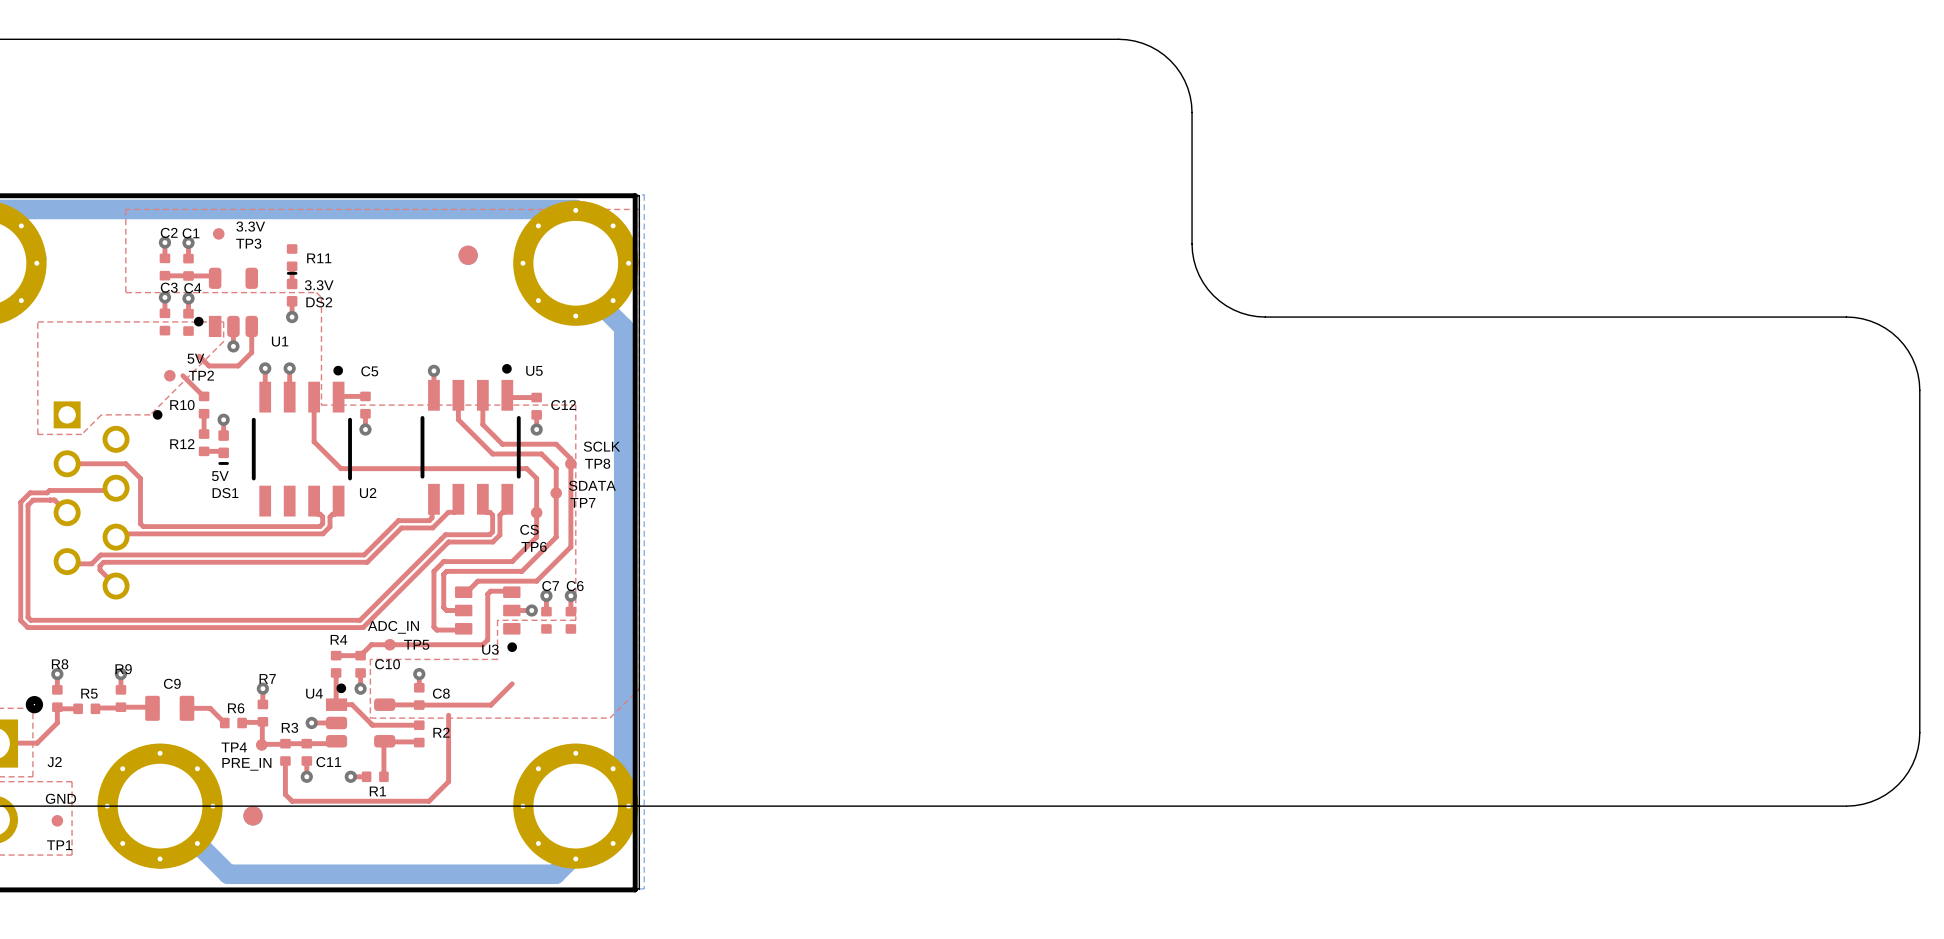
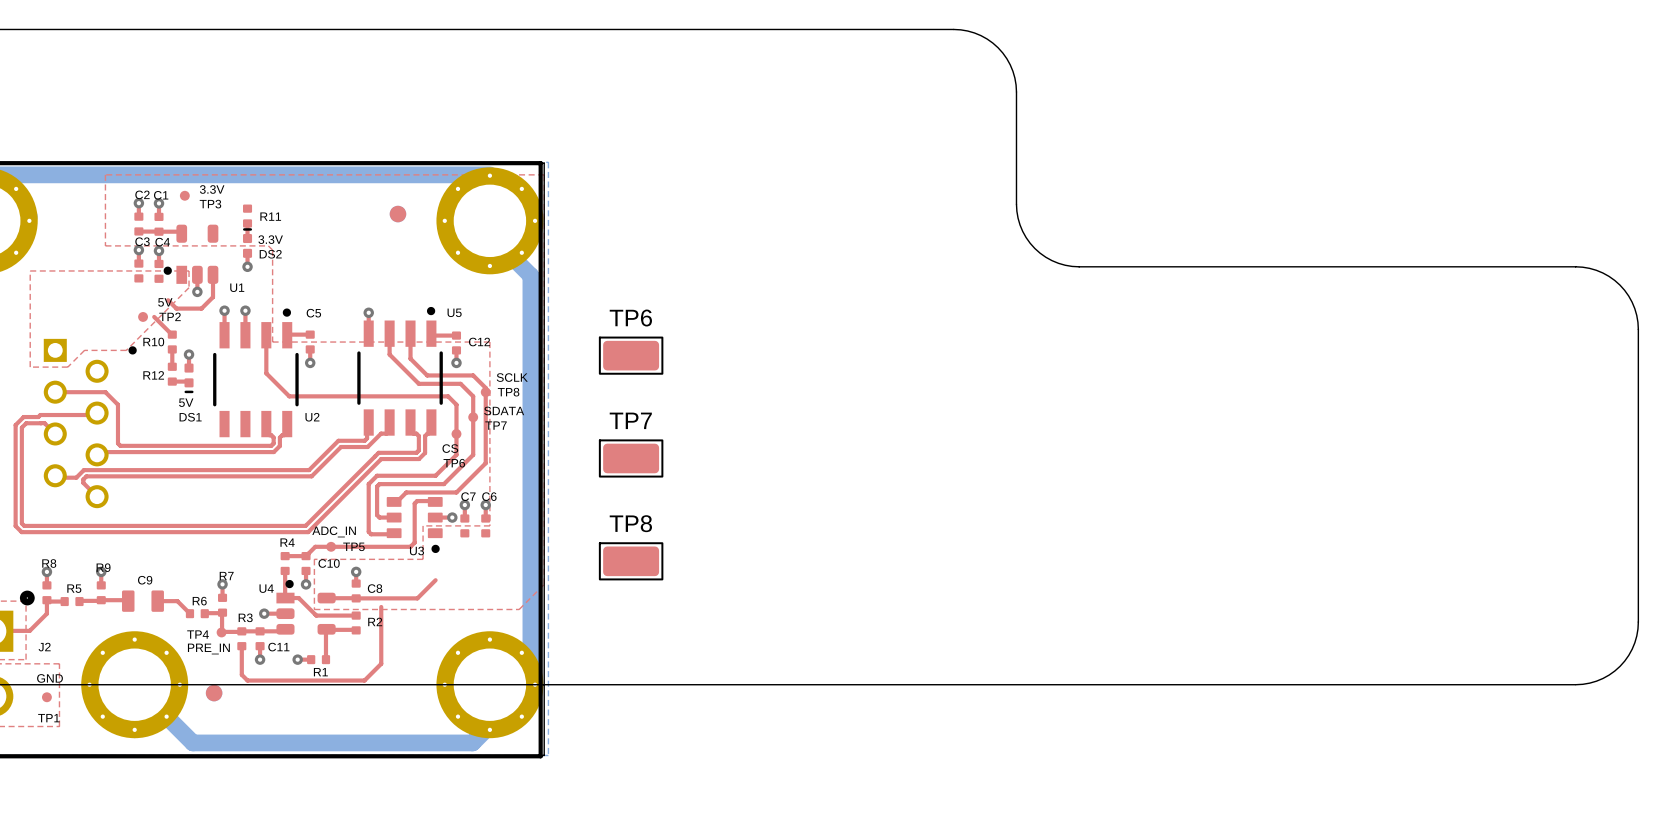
TP6: none -> (631, 355)
TP7: none -> (631, 458)
TP8: none -> (631, 561)

